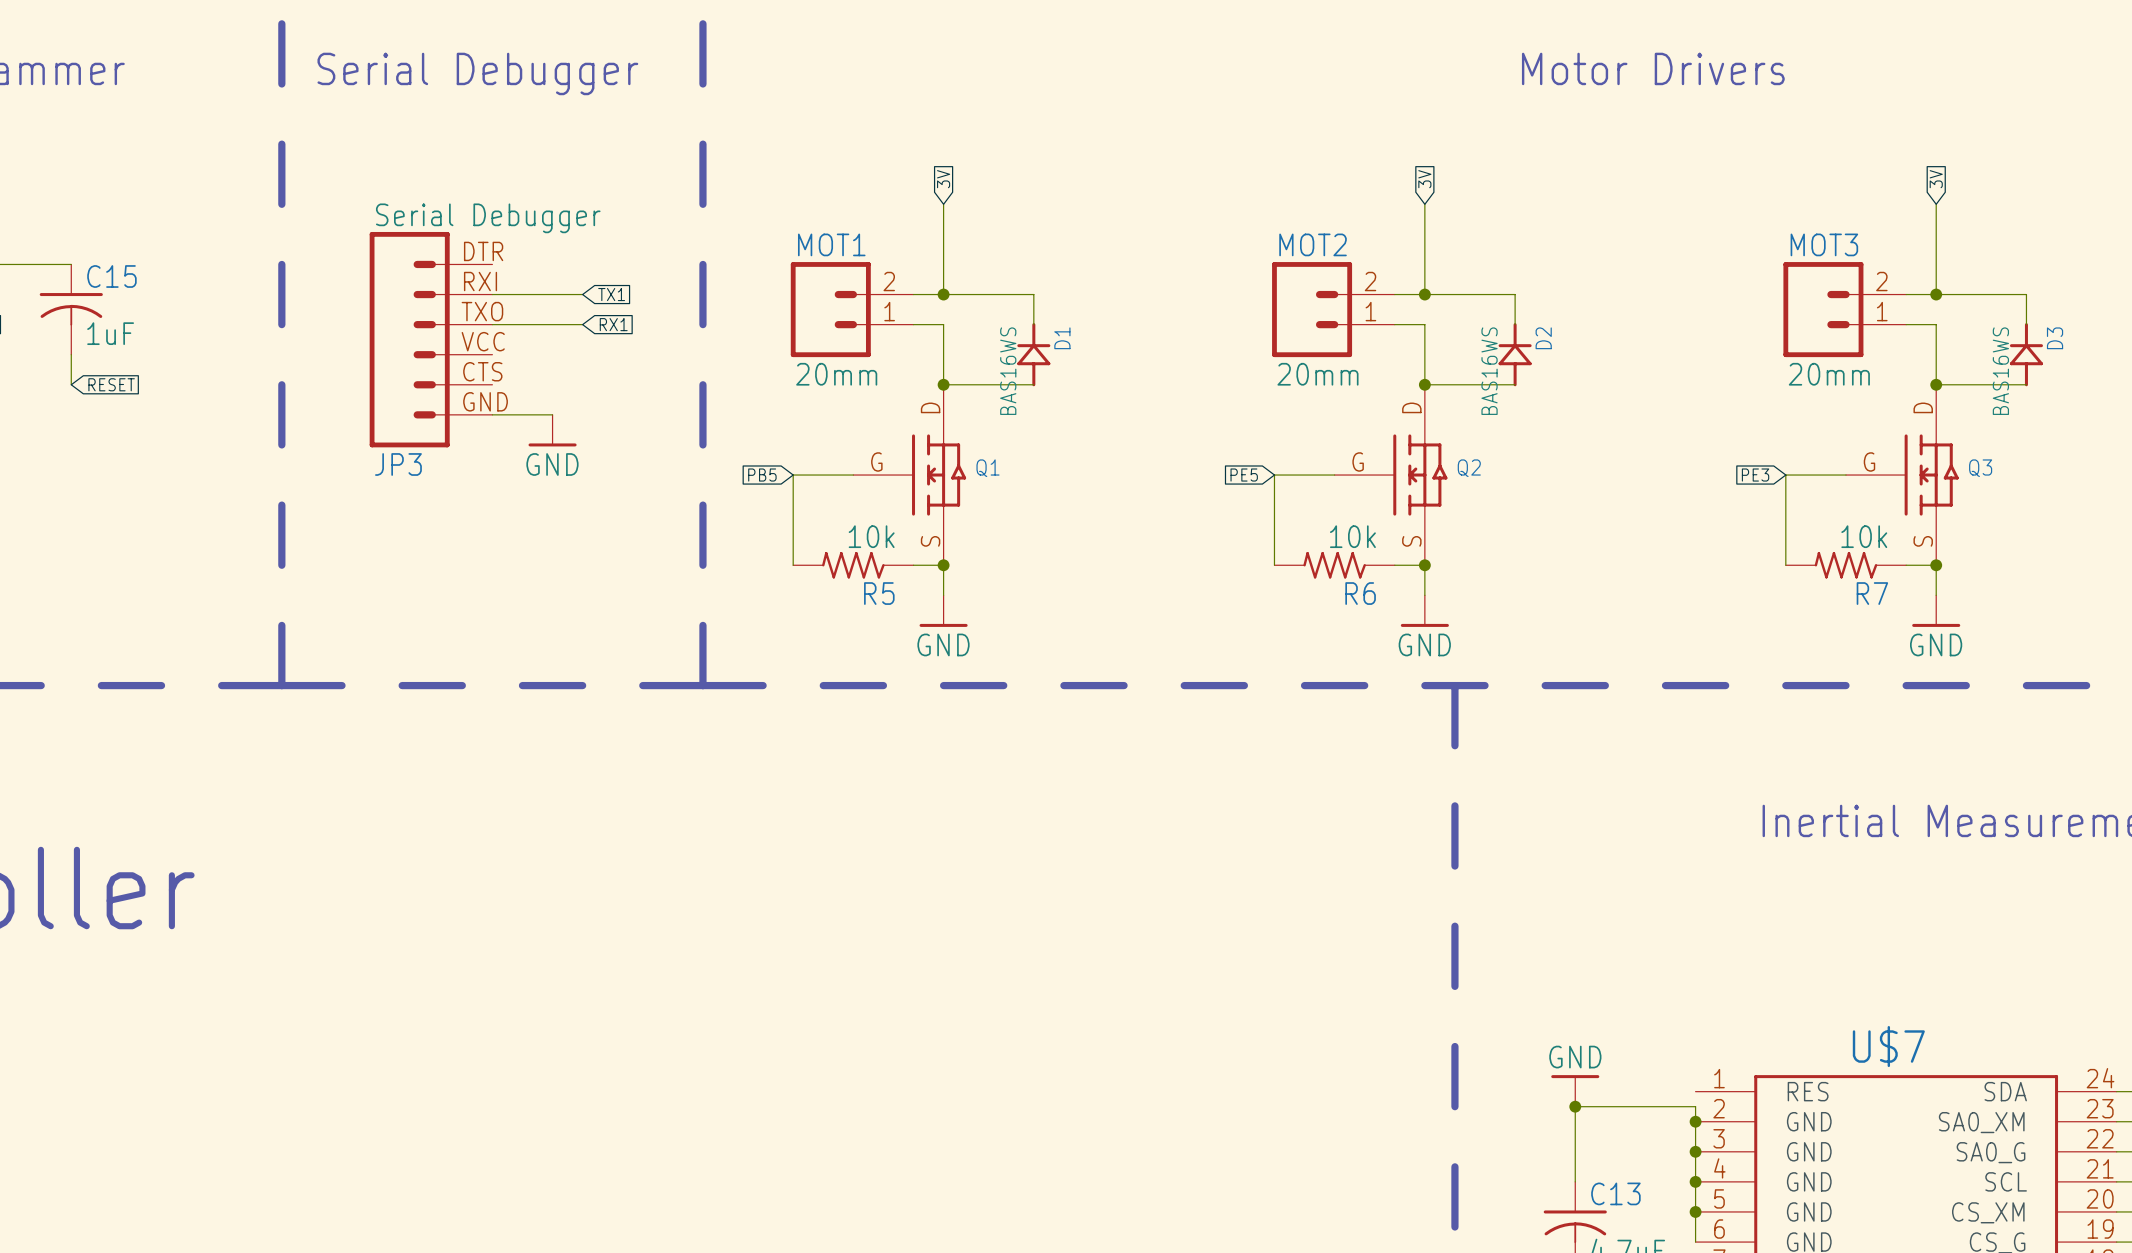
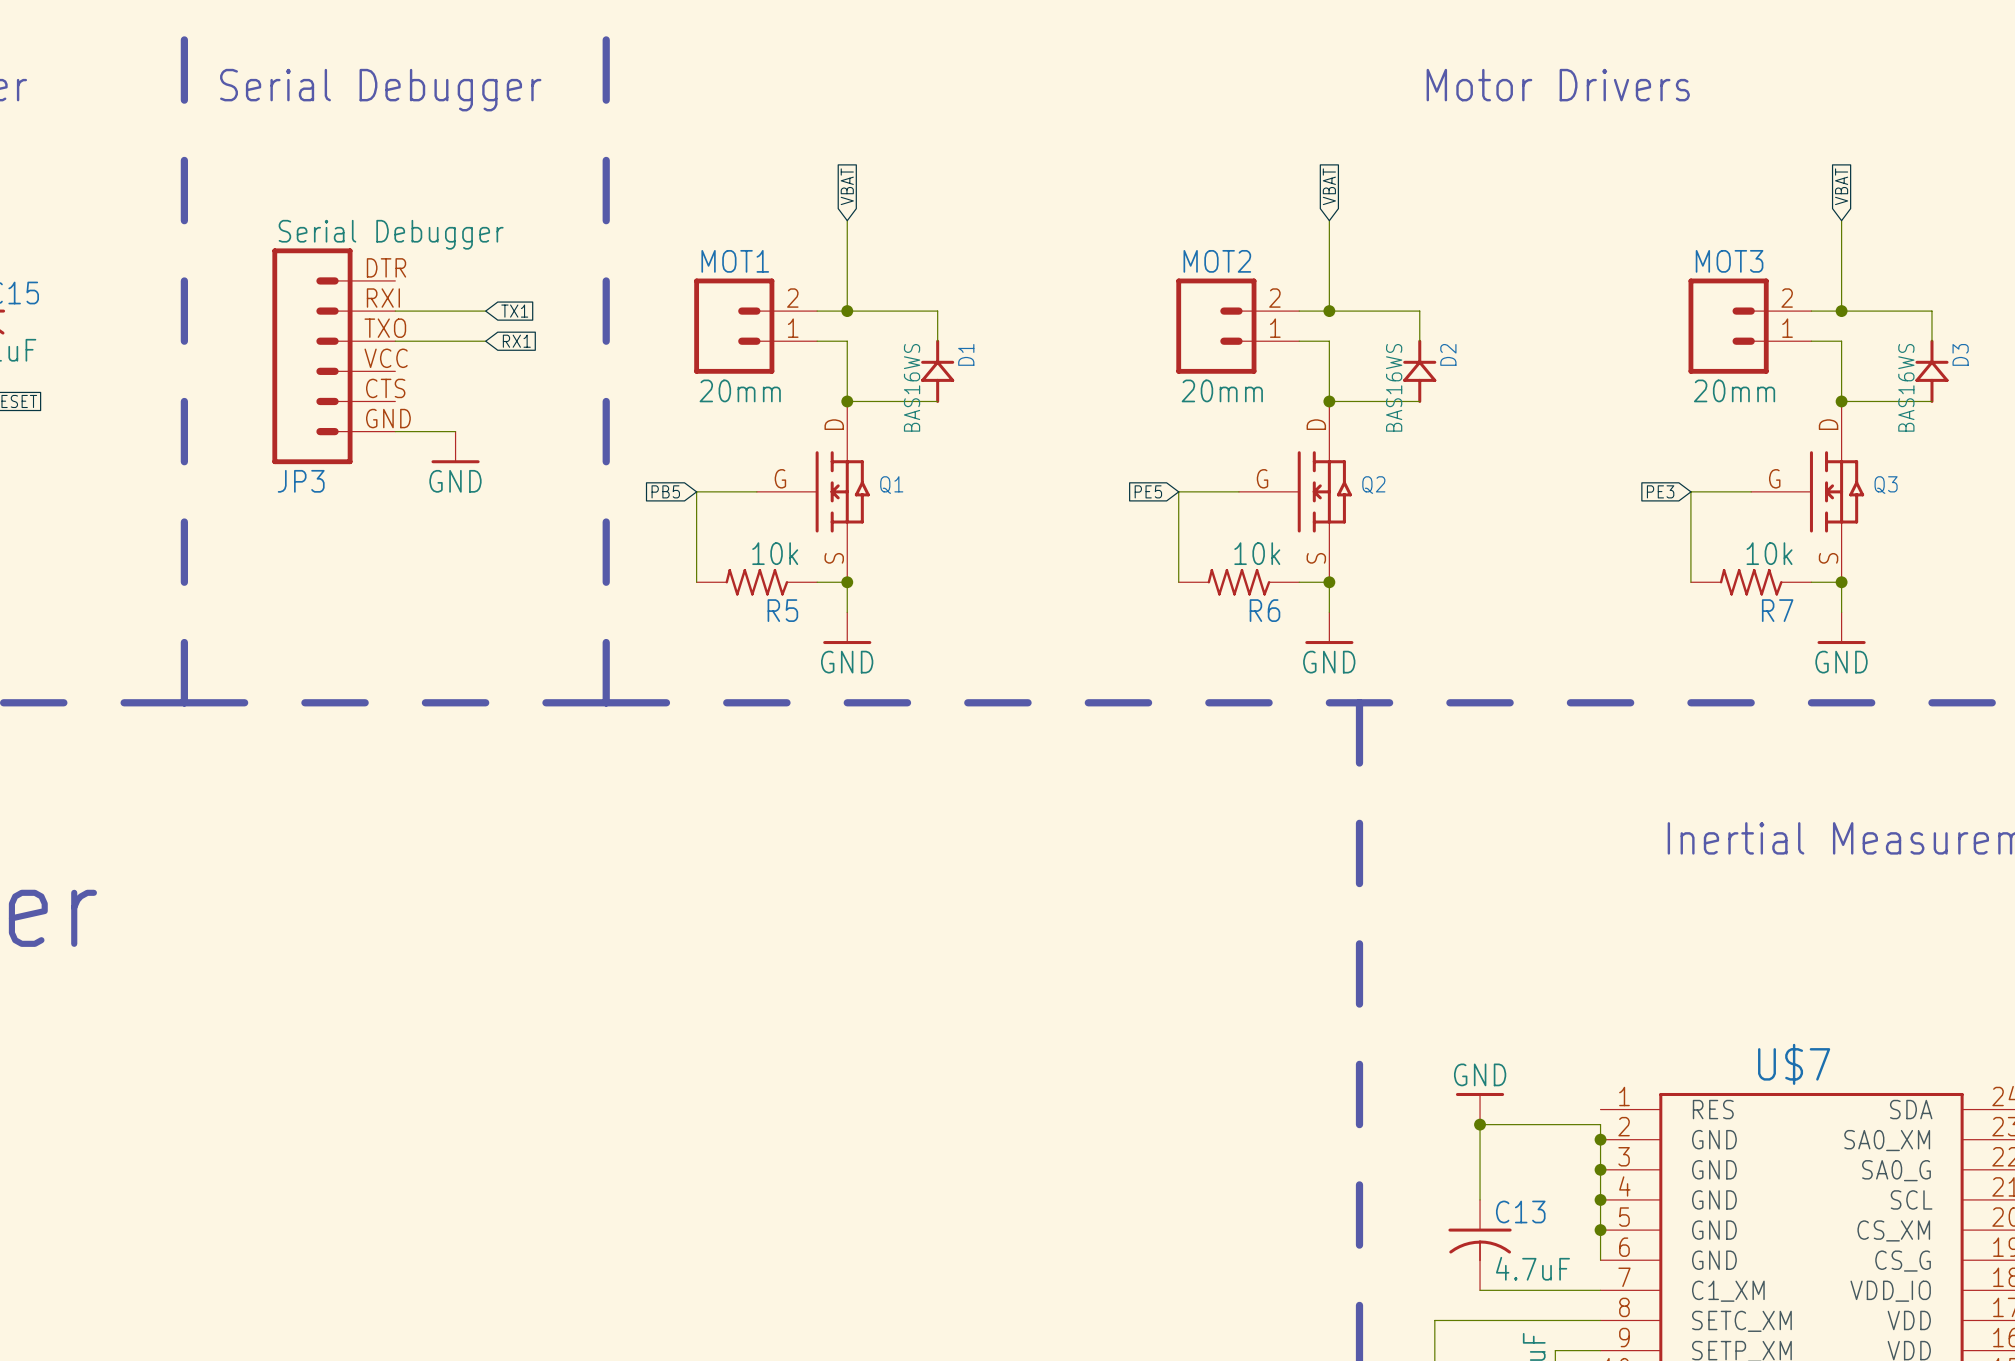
global label: 3V (943, 179) -> VBAT (847, 186)
global label: 3V (1424, 179) -> VBAT (1329, 186)
global label: 3V (1936, 179) -> VBAT (1841, 186)

